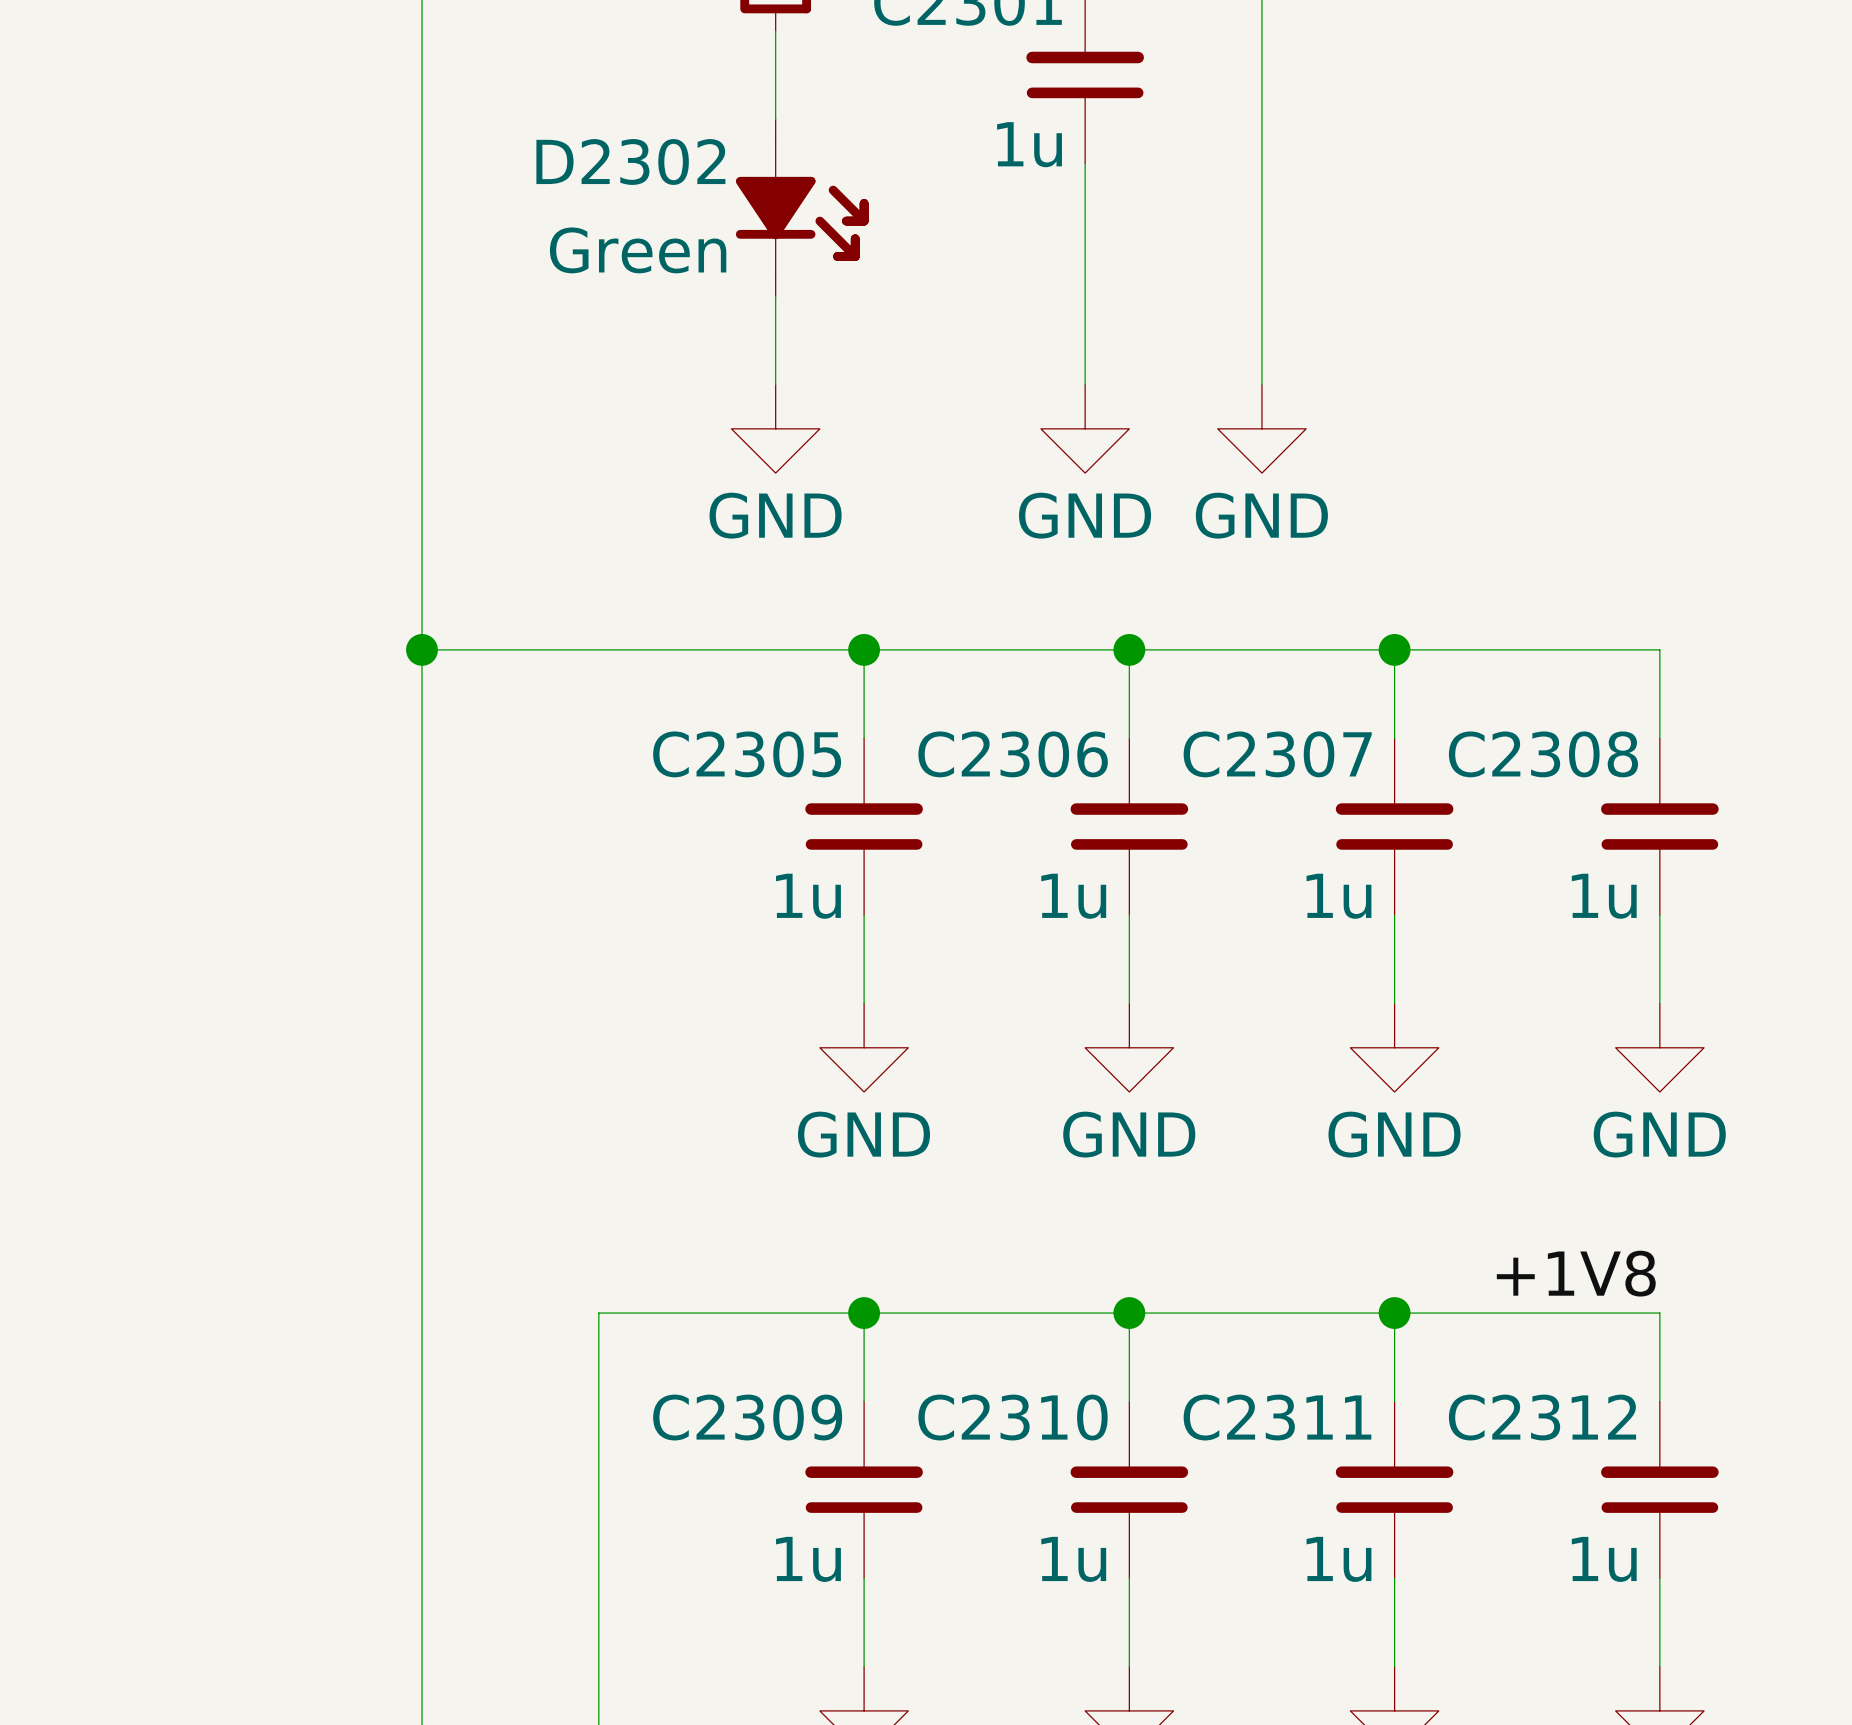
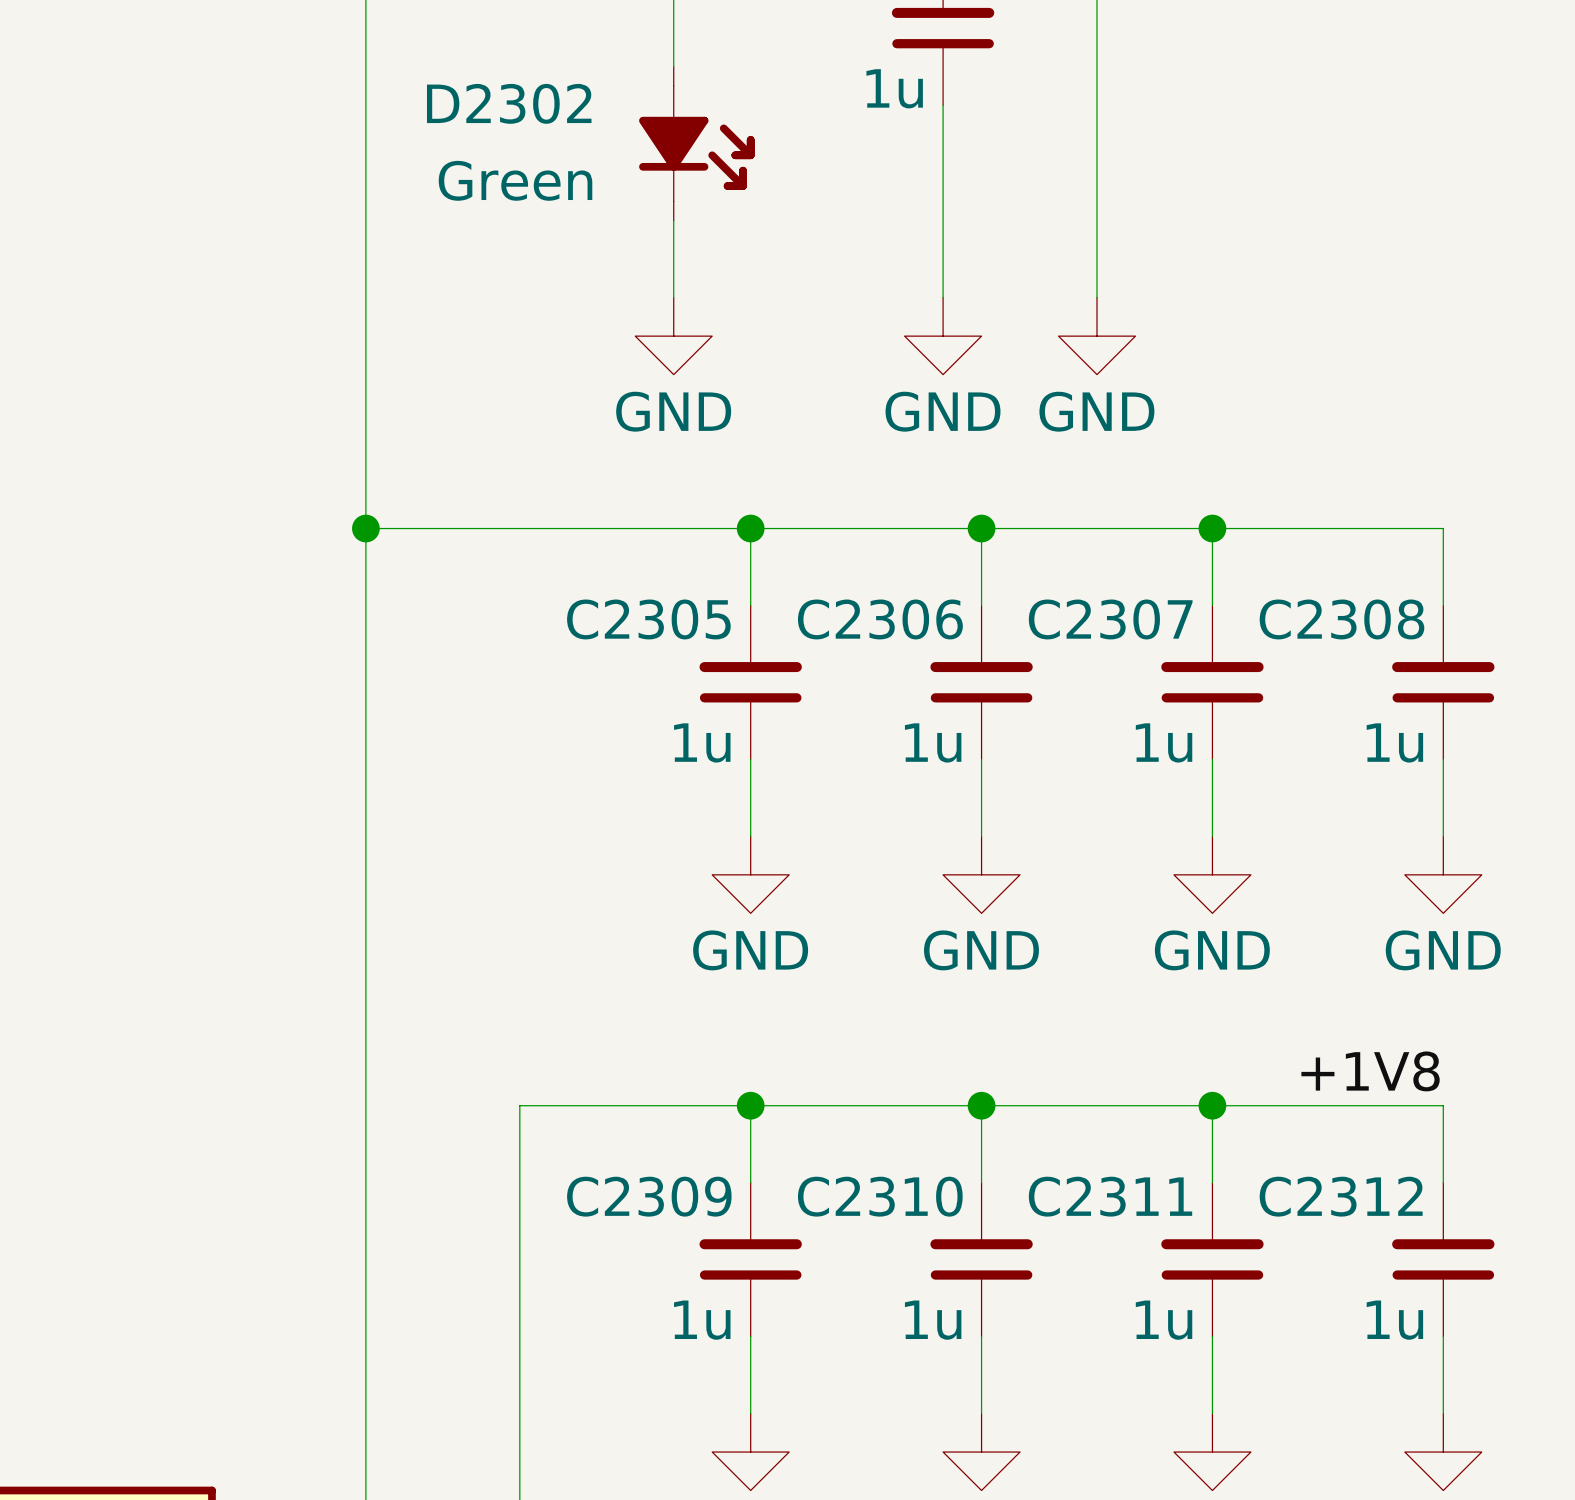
D2302 name position: D2302 (630, 161) -> D2302 (509, 103)
D2302 text position: Green (638, 250) -> Green (515, 180)

